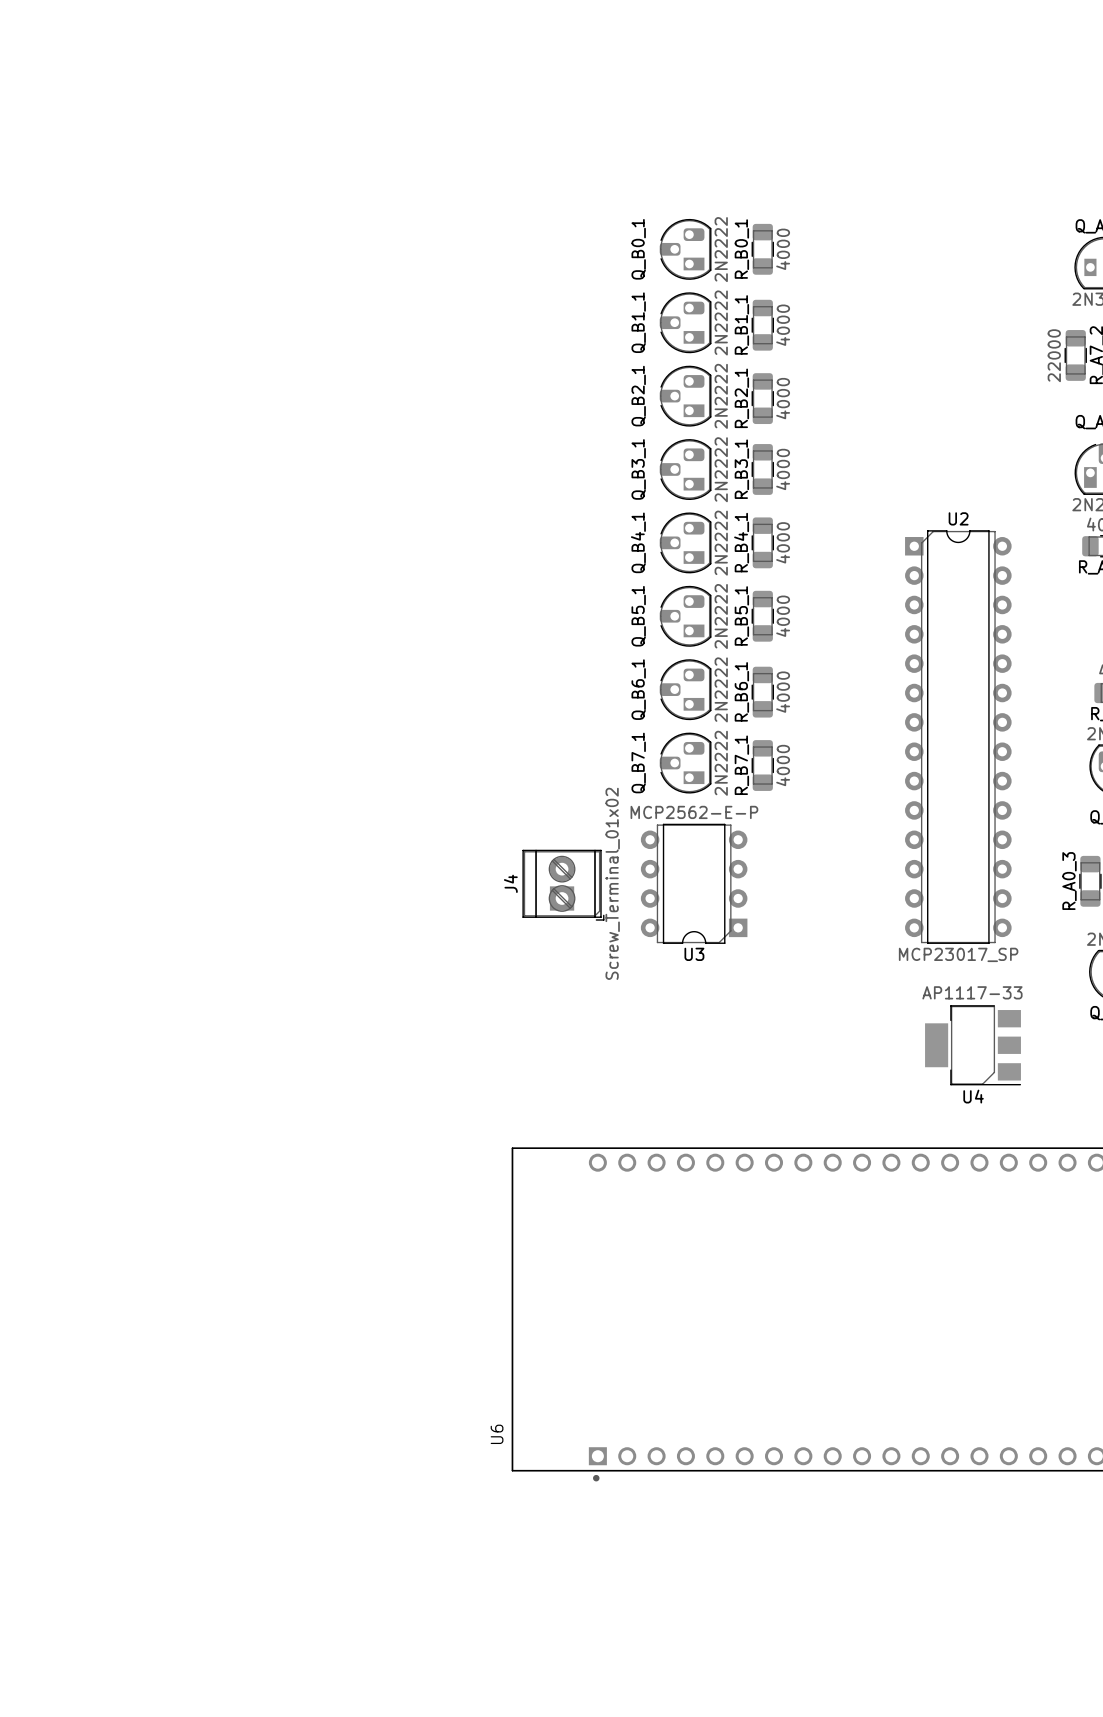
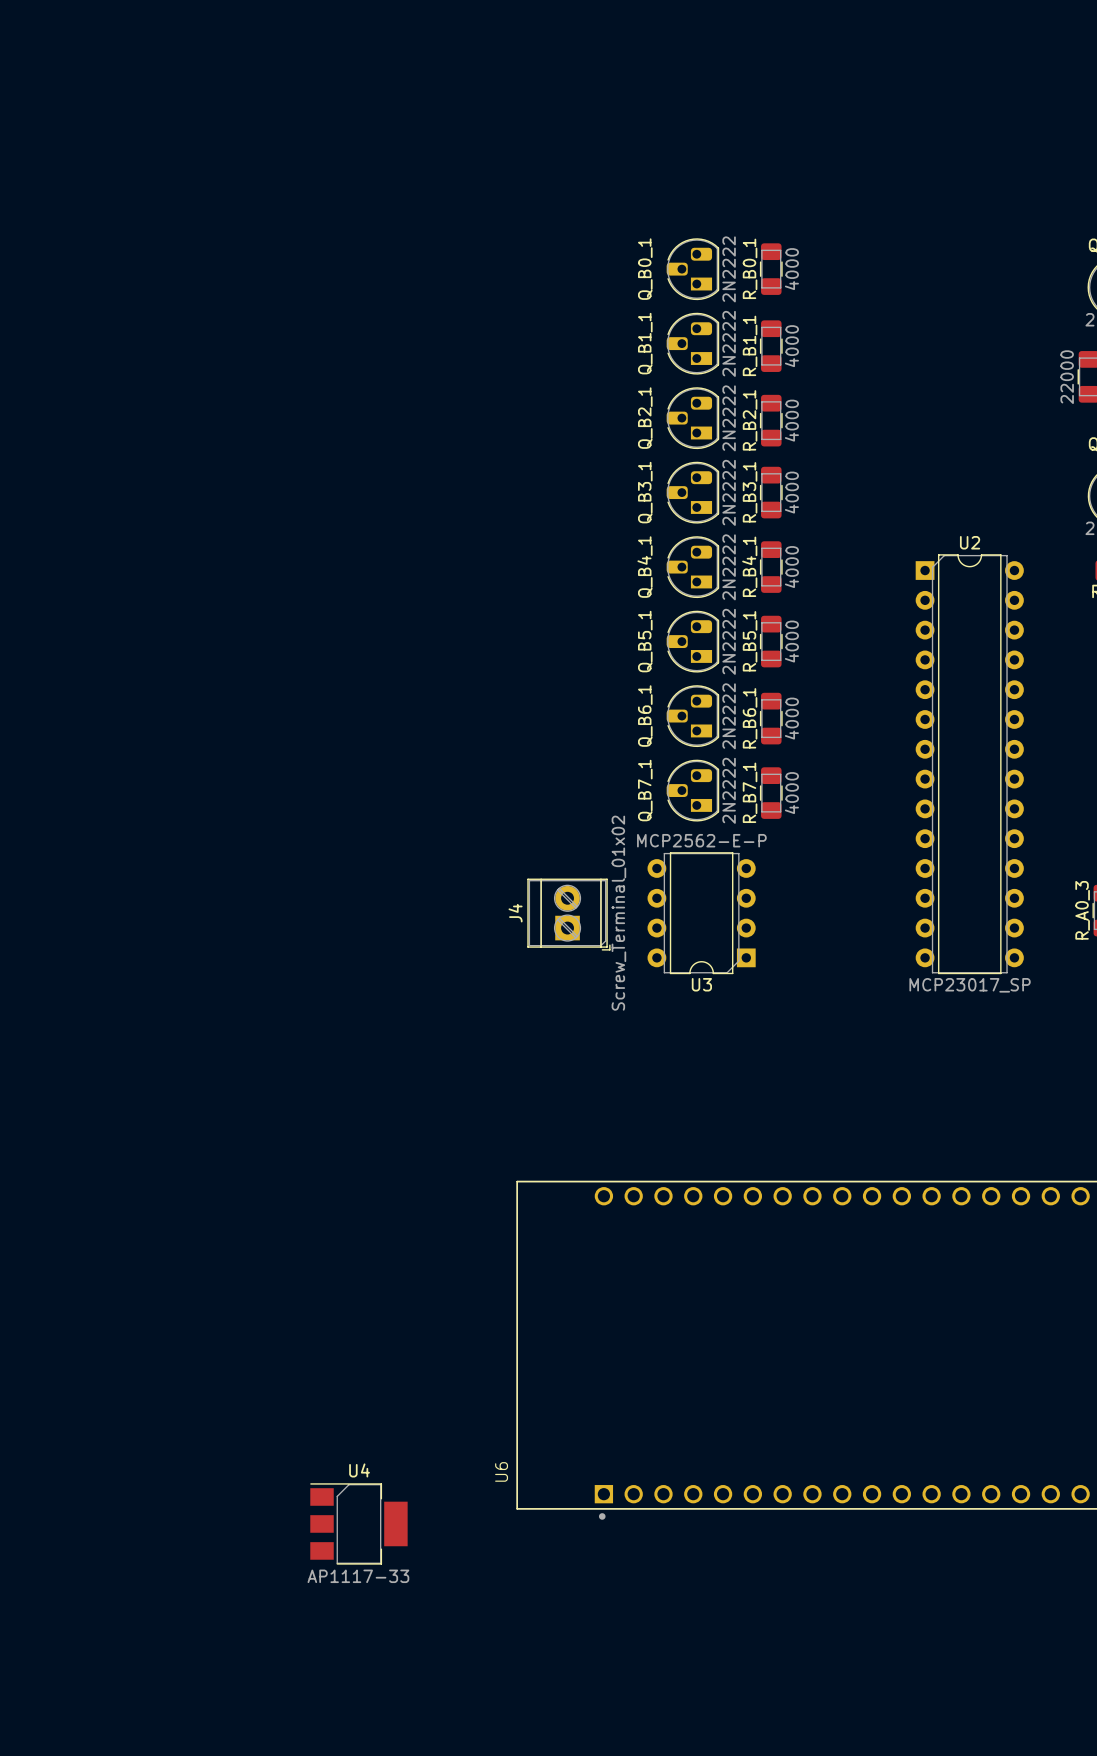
U4 rotation: 0° (973, 1045) -> 180° (358, 1523)
U4 position: (973, 1045) -> (358, 1523)

